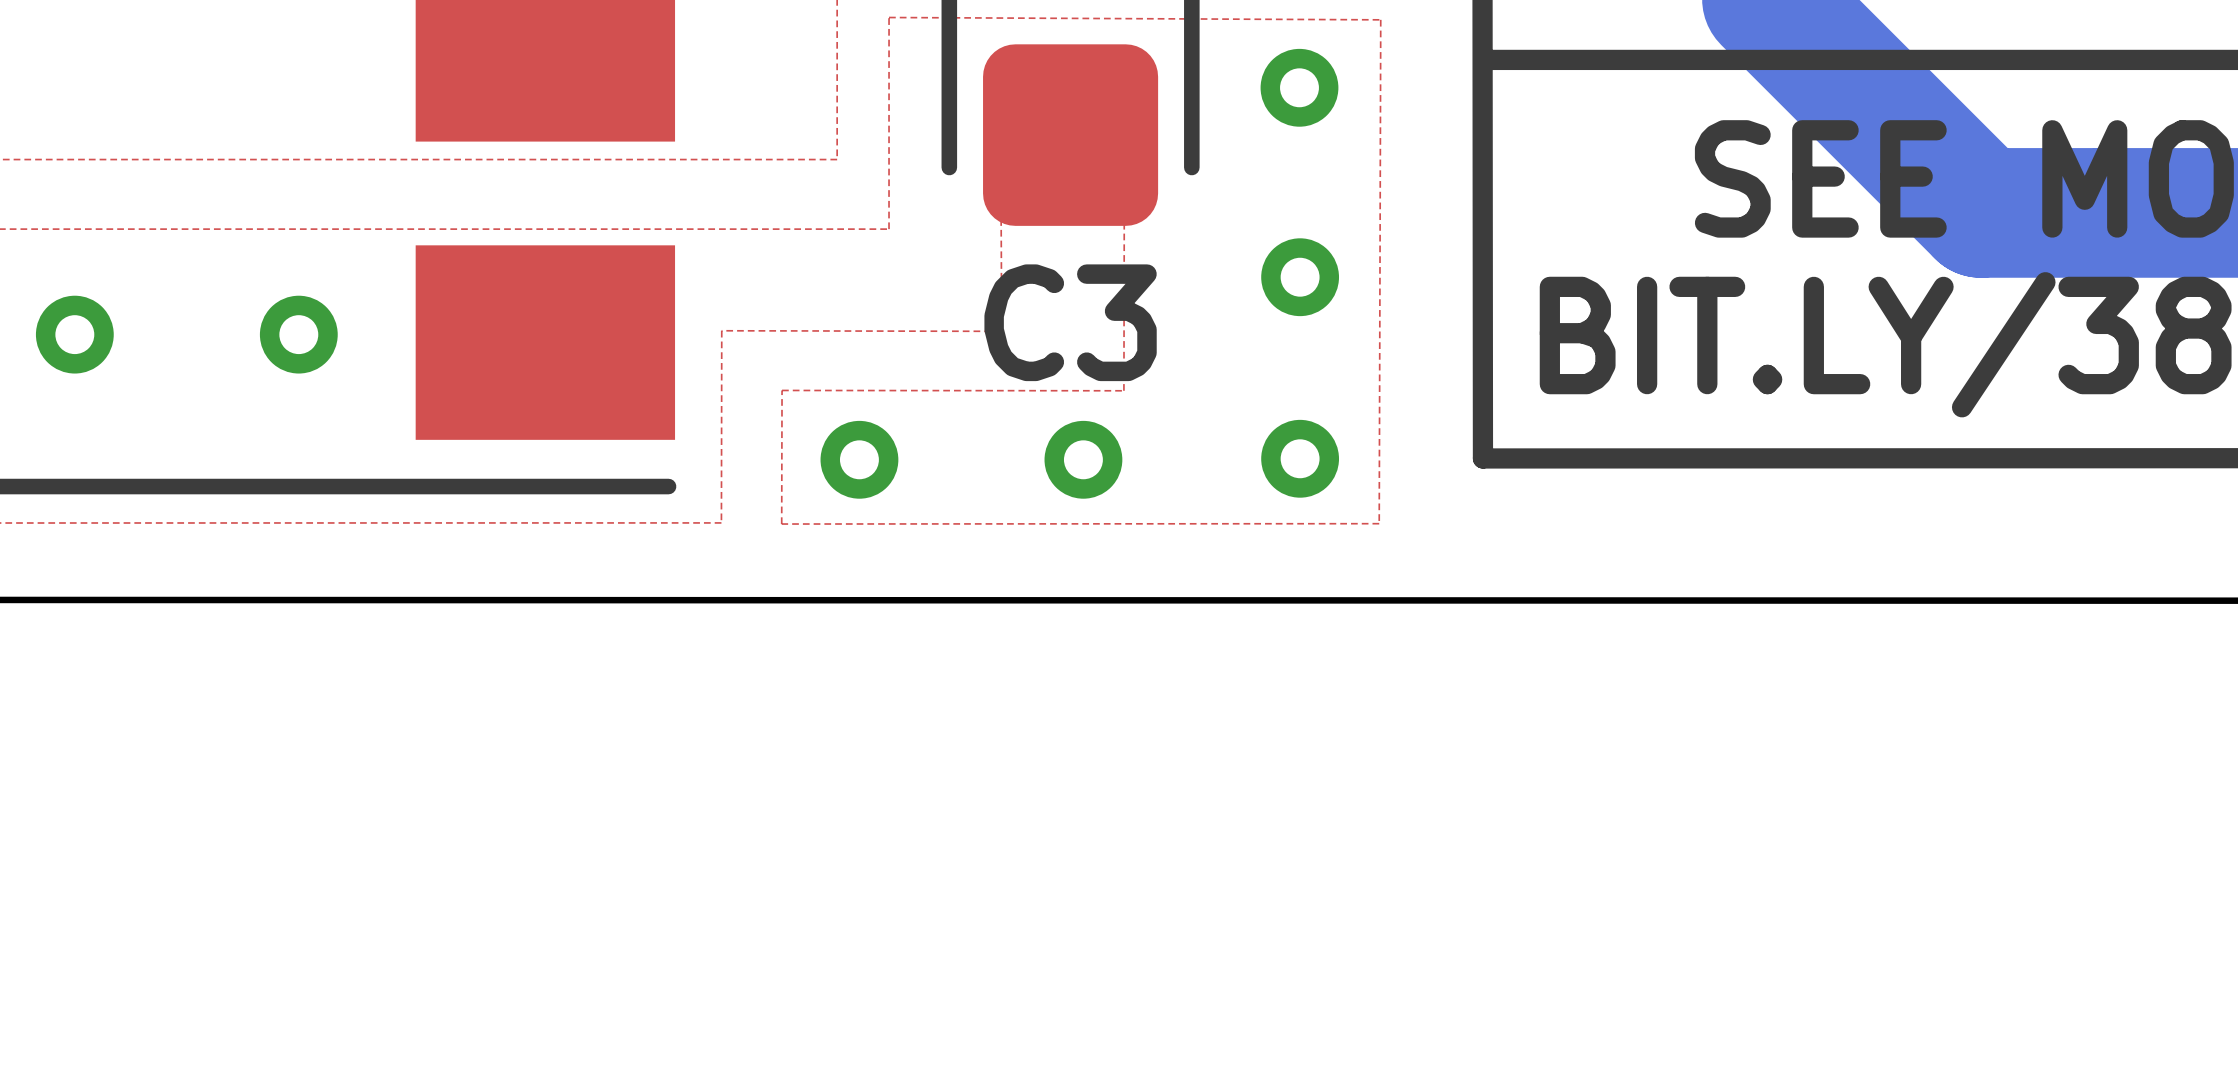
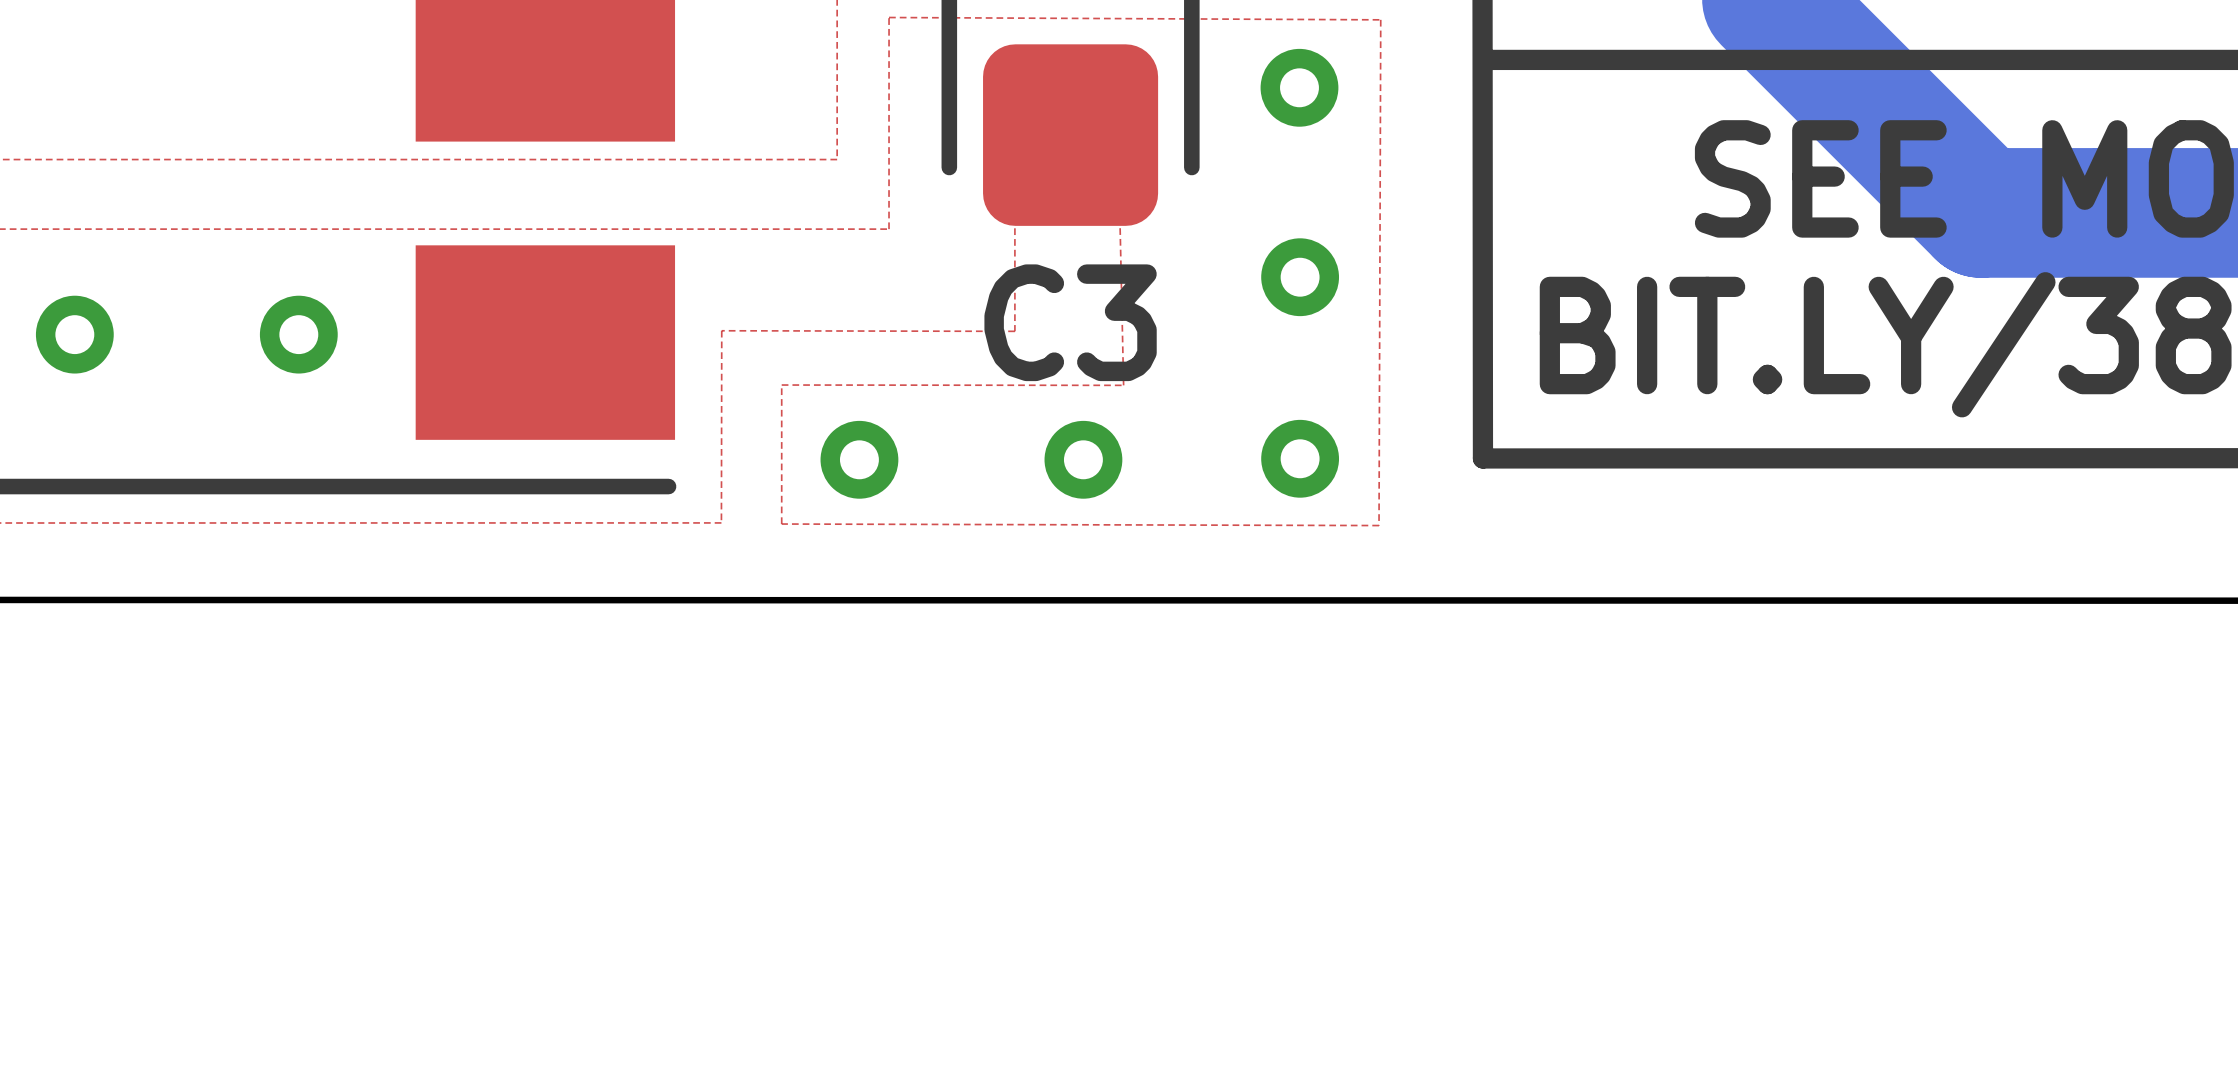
top zone outline: (1380, 19) (1379, 523) (781, 524) (782, 390) (1123, 390) (1124, 208) (1001, 208) (1001, 331) (721, 330) -> (1380, 19) (1379, 525) (781, 524) (781, 385) (1123, 385) (1119, 206) (1014, 206) (1014, 331) (721, 330)

